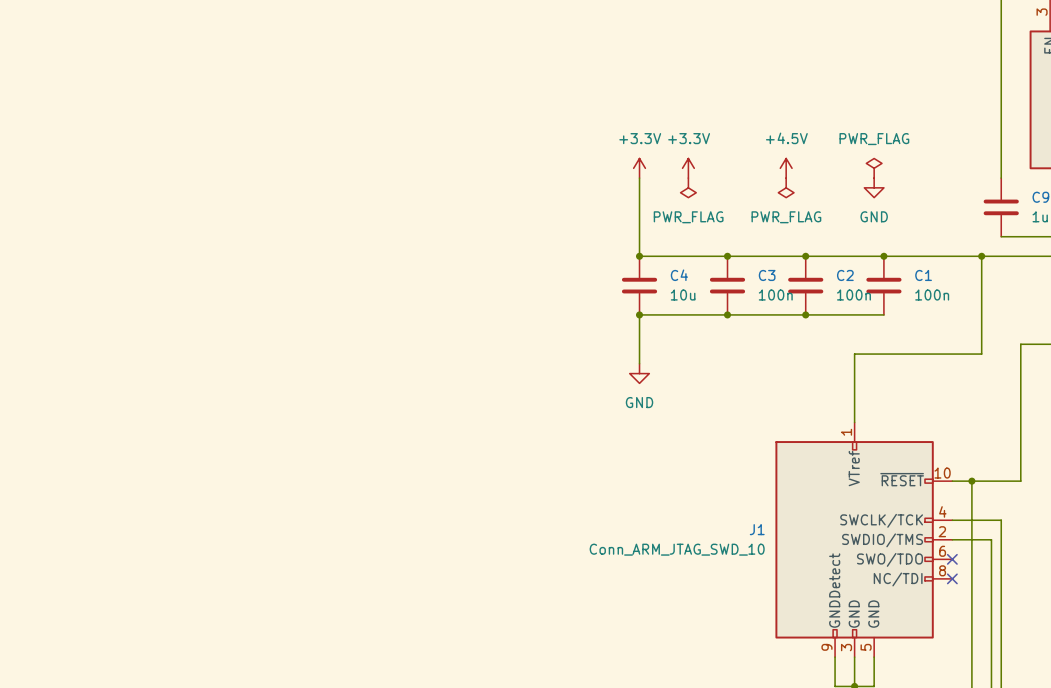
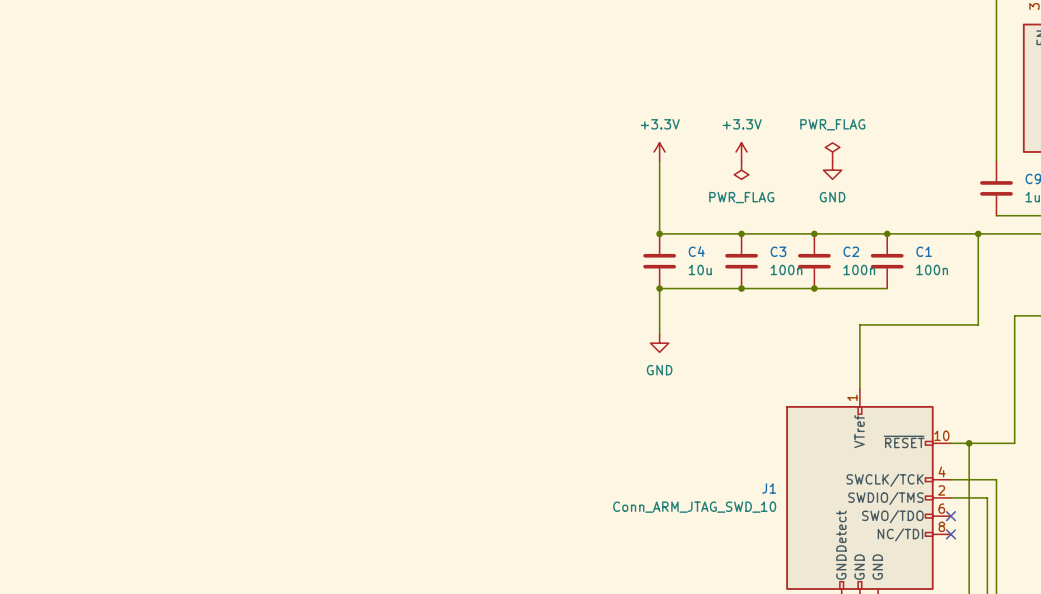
power symbol position: +3.3V (688, 168) -> +3.3V (741, 151)
power symbol: +4.5V (786, 168) -> none
power symbol: none -> PWR_FLAG (832, 151)
power symbol: PWR_FLAG (874, 168) -> none
power symbol: PWR_FLAG (688, 187) -> none
power symbol: none -> PWR_FLAG (741, 170)
power symbol: PWR_FLAG (786, 187) -> none
power symbol position: GND (874, 187) -> GND (832, 170)

